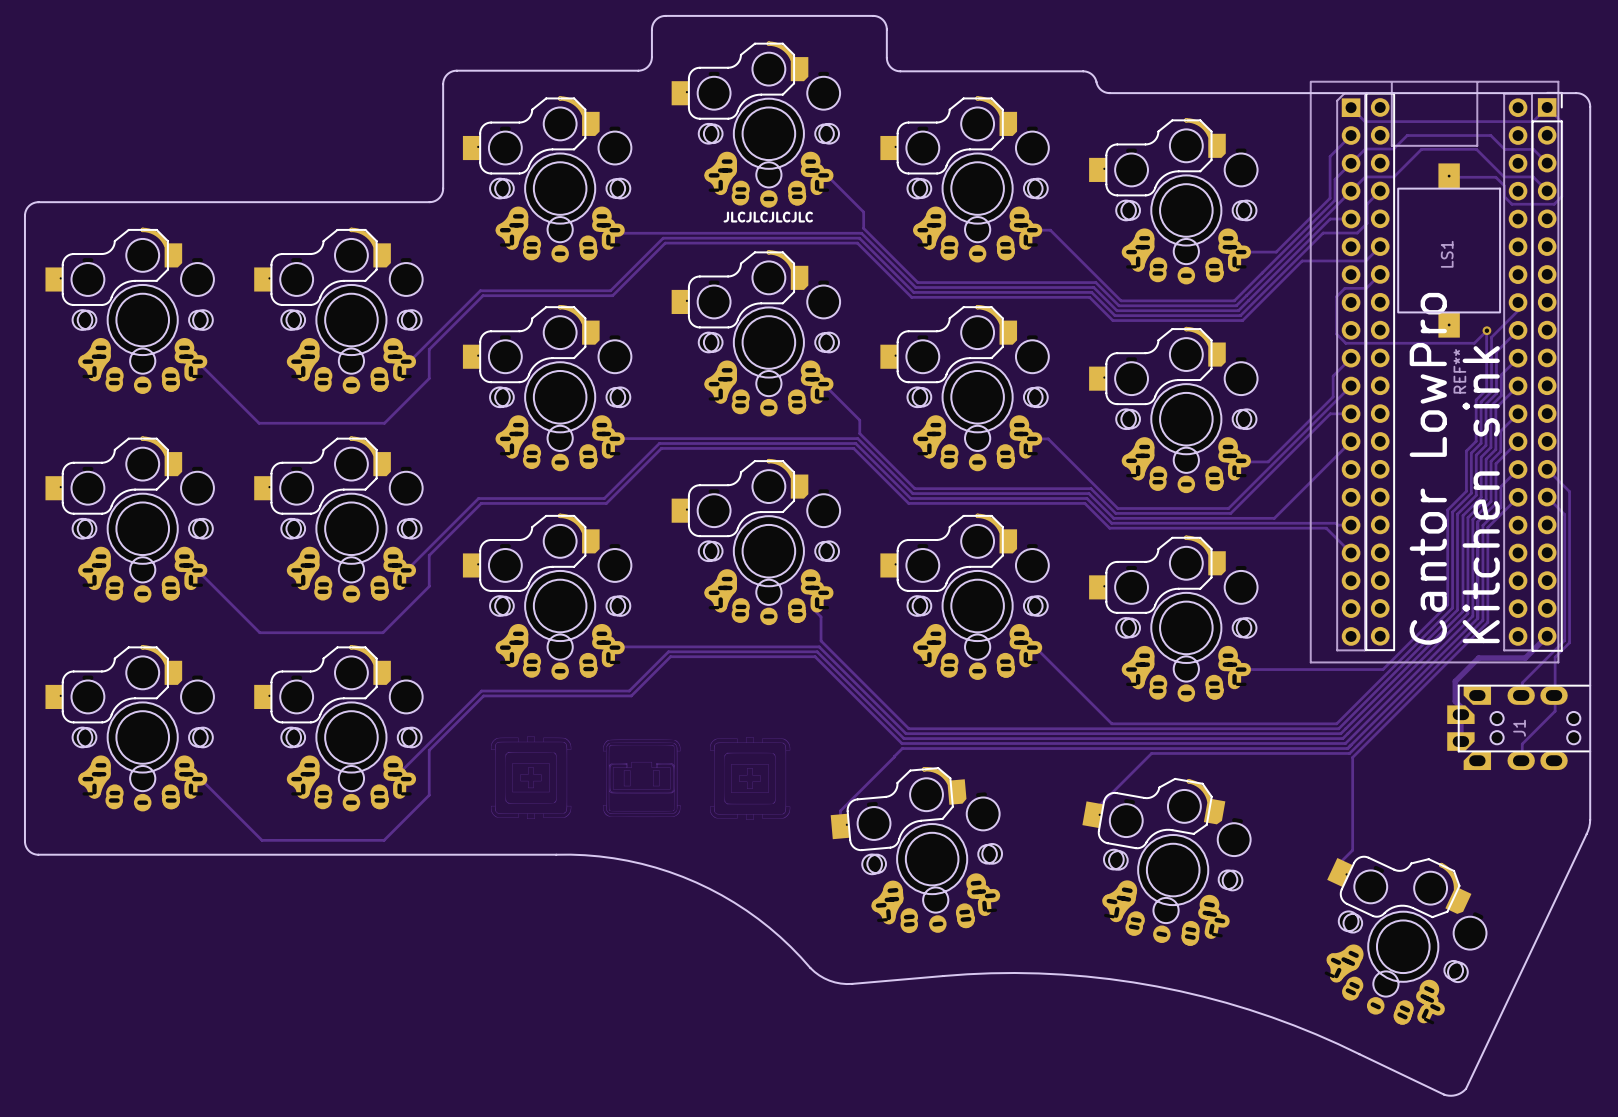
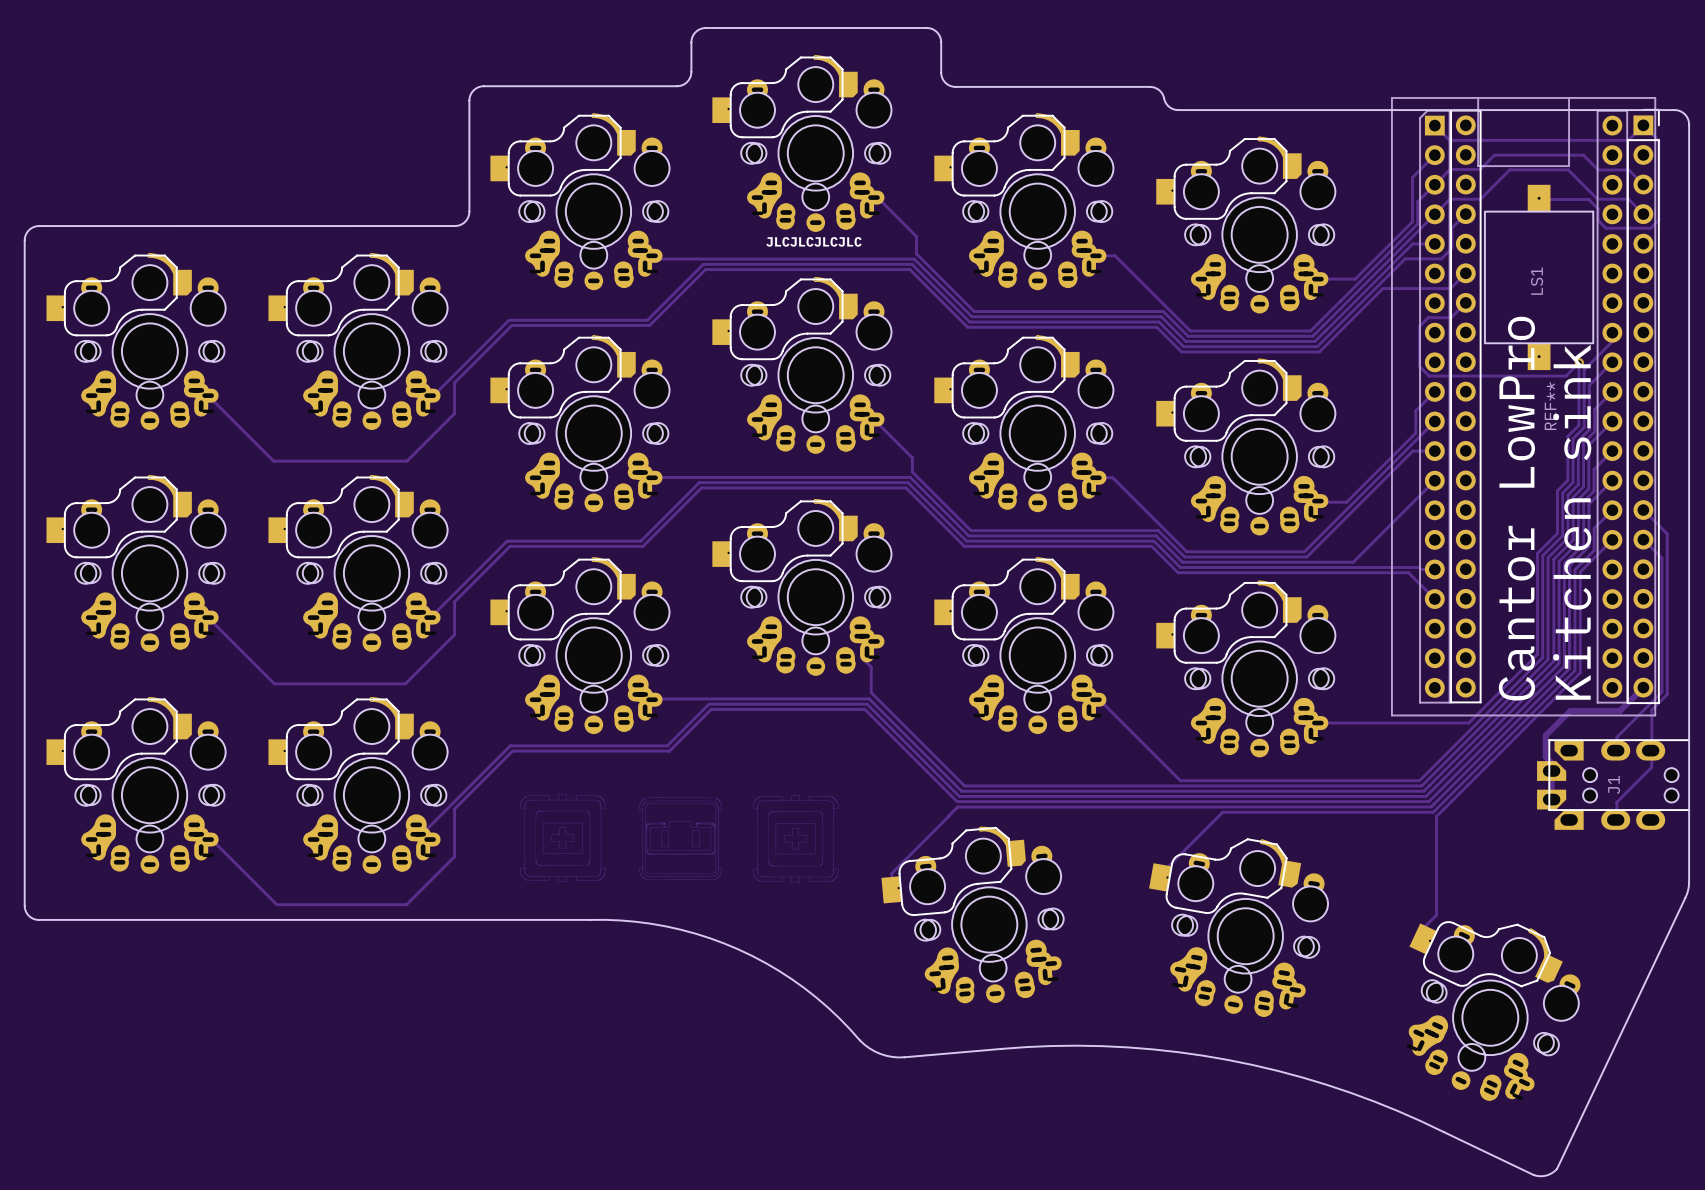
part footprint: [671, 41, 841, 208] -> [712, 55, 892, 232]
part footprint: [462, 96, 632, 263] -> [490, 113, 670, 291]
part footprint: [880, 96, 1049, 263] -> [934, 113, 1114, 291]
part footprint: [1089, 118, 1258, 285] -> [1156, 136, 1336, 314]
part footprint: [45, 227, 214, 394] -> [46, 253, 226, 431]
part footprint: [254, 227, 423, 394] -> [268, 253, 448, 431]
part footprint: [671, 250, 841, 417] -> [712, 277, 892, 454]
part footprint: [462, 304, 632, 472] -> [490, 335, 670, 513]
part footprint: [880, 304, 1049, 472] -> [934, 335, 1114, 513]
part footprint: [1089, 326, 1258, 494] -> [1156, 358, 1336, 536]
part footprint: [45, 436, 214, 603] -> [46, 475, 226, 652]
part footprint: [254, 436, 423, 603] -> [268, 475, 448, 652]
part footprint: [671, 458, 841, 626] -> [712, 499, 892, 676]
part footprint: [462, 513, 632, 680] -> [490, 557, 670, 735]
part footprint: [880, 513, 1049, 680] -> [934, 557, 1114, 735]
part footprint: [1089, 535, 1258, 702] -> [1156, 580, 1336, 758]
part footprint: [45, 645, 214, 812] -> [46, 697, 226, 874]
part footprint: [254, 645, 423, 812] -> [268, 697, 448, 874]
part footprint: [830, 767, 1003, 934] -> [881, 826, 1064, 1004]
part footprint: [1082, 778, 1251, 946] -> [1149, 838, 1329, 1017]
part footprint: [1324, 855, 1487, 1025] -> [1406, 921, 1581, 1101]

